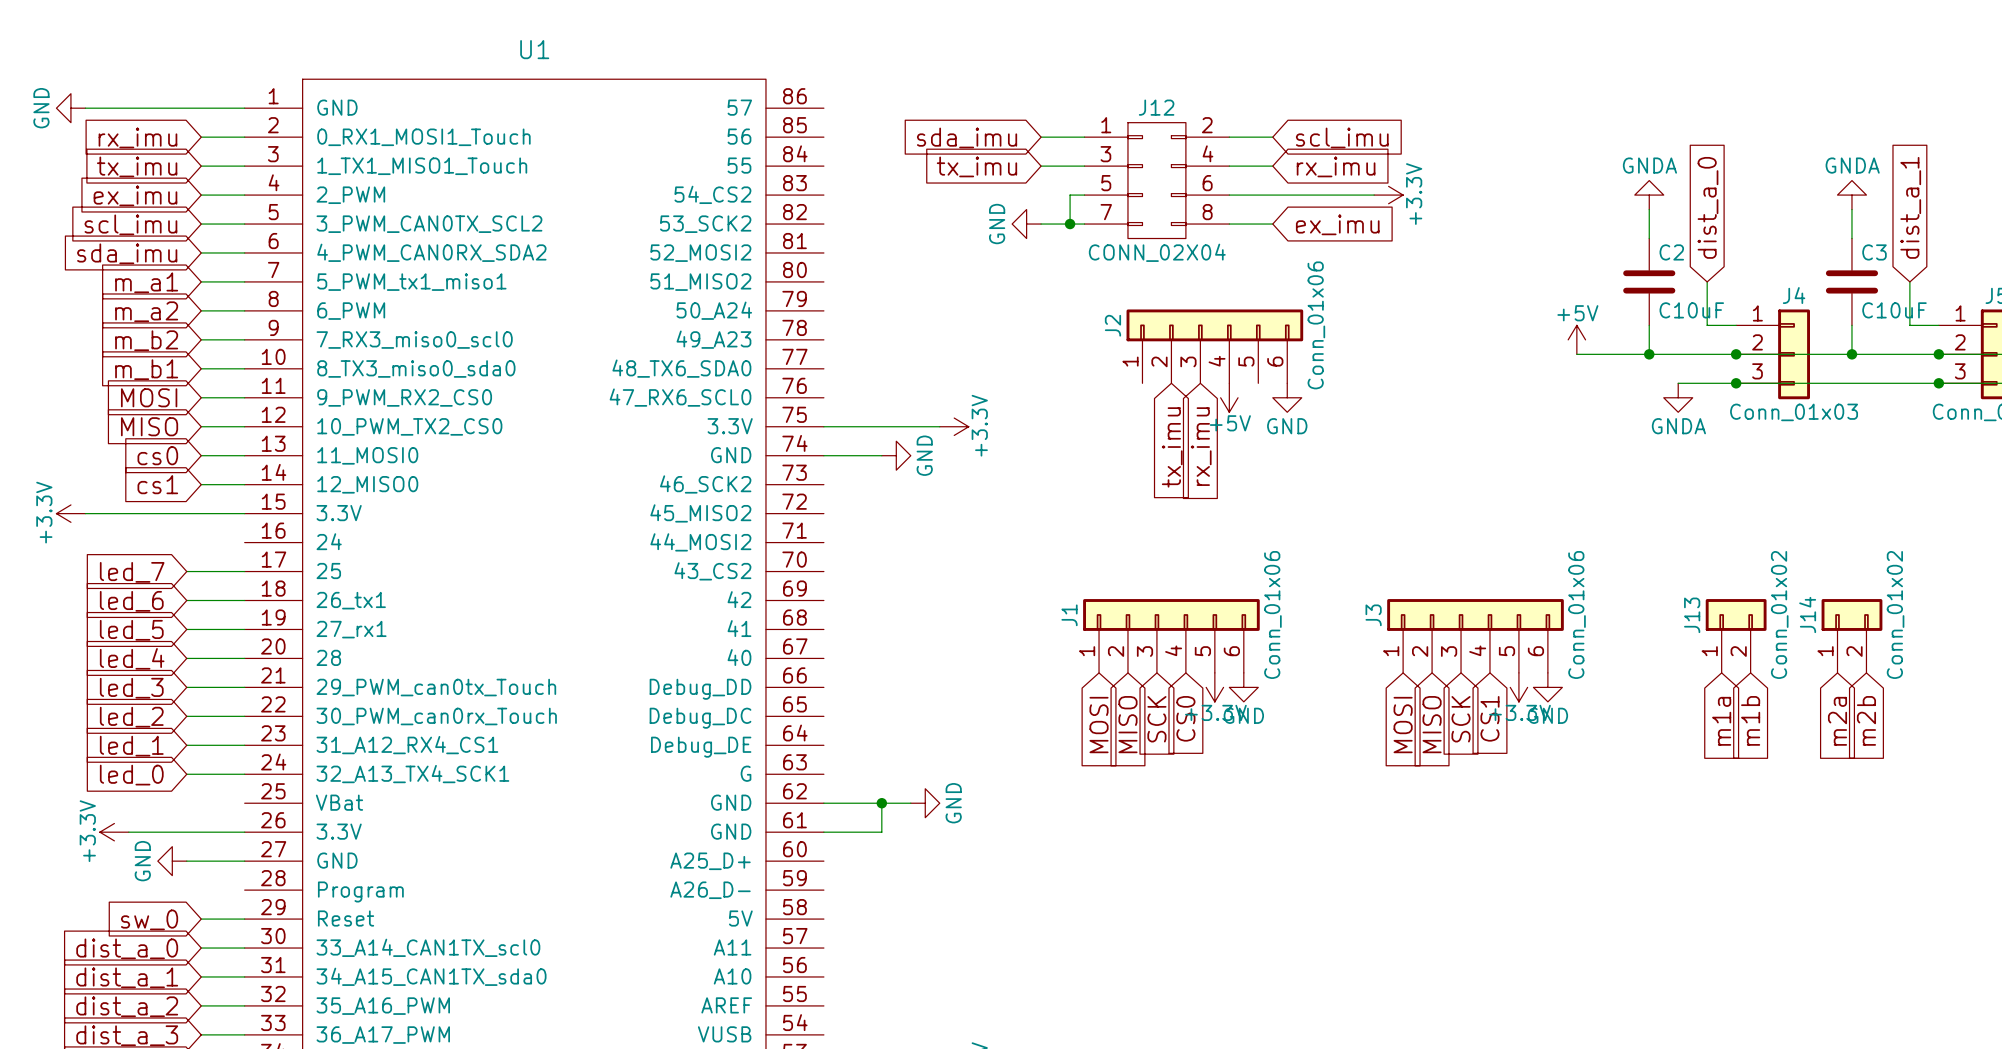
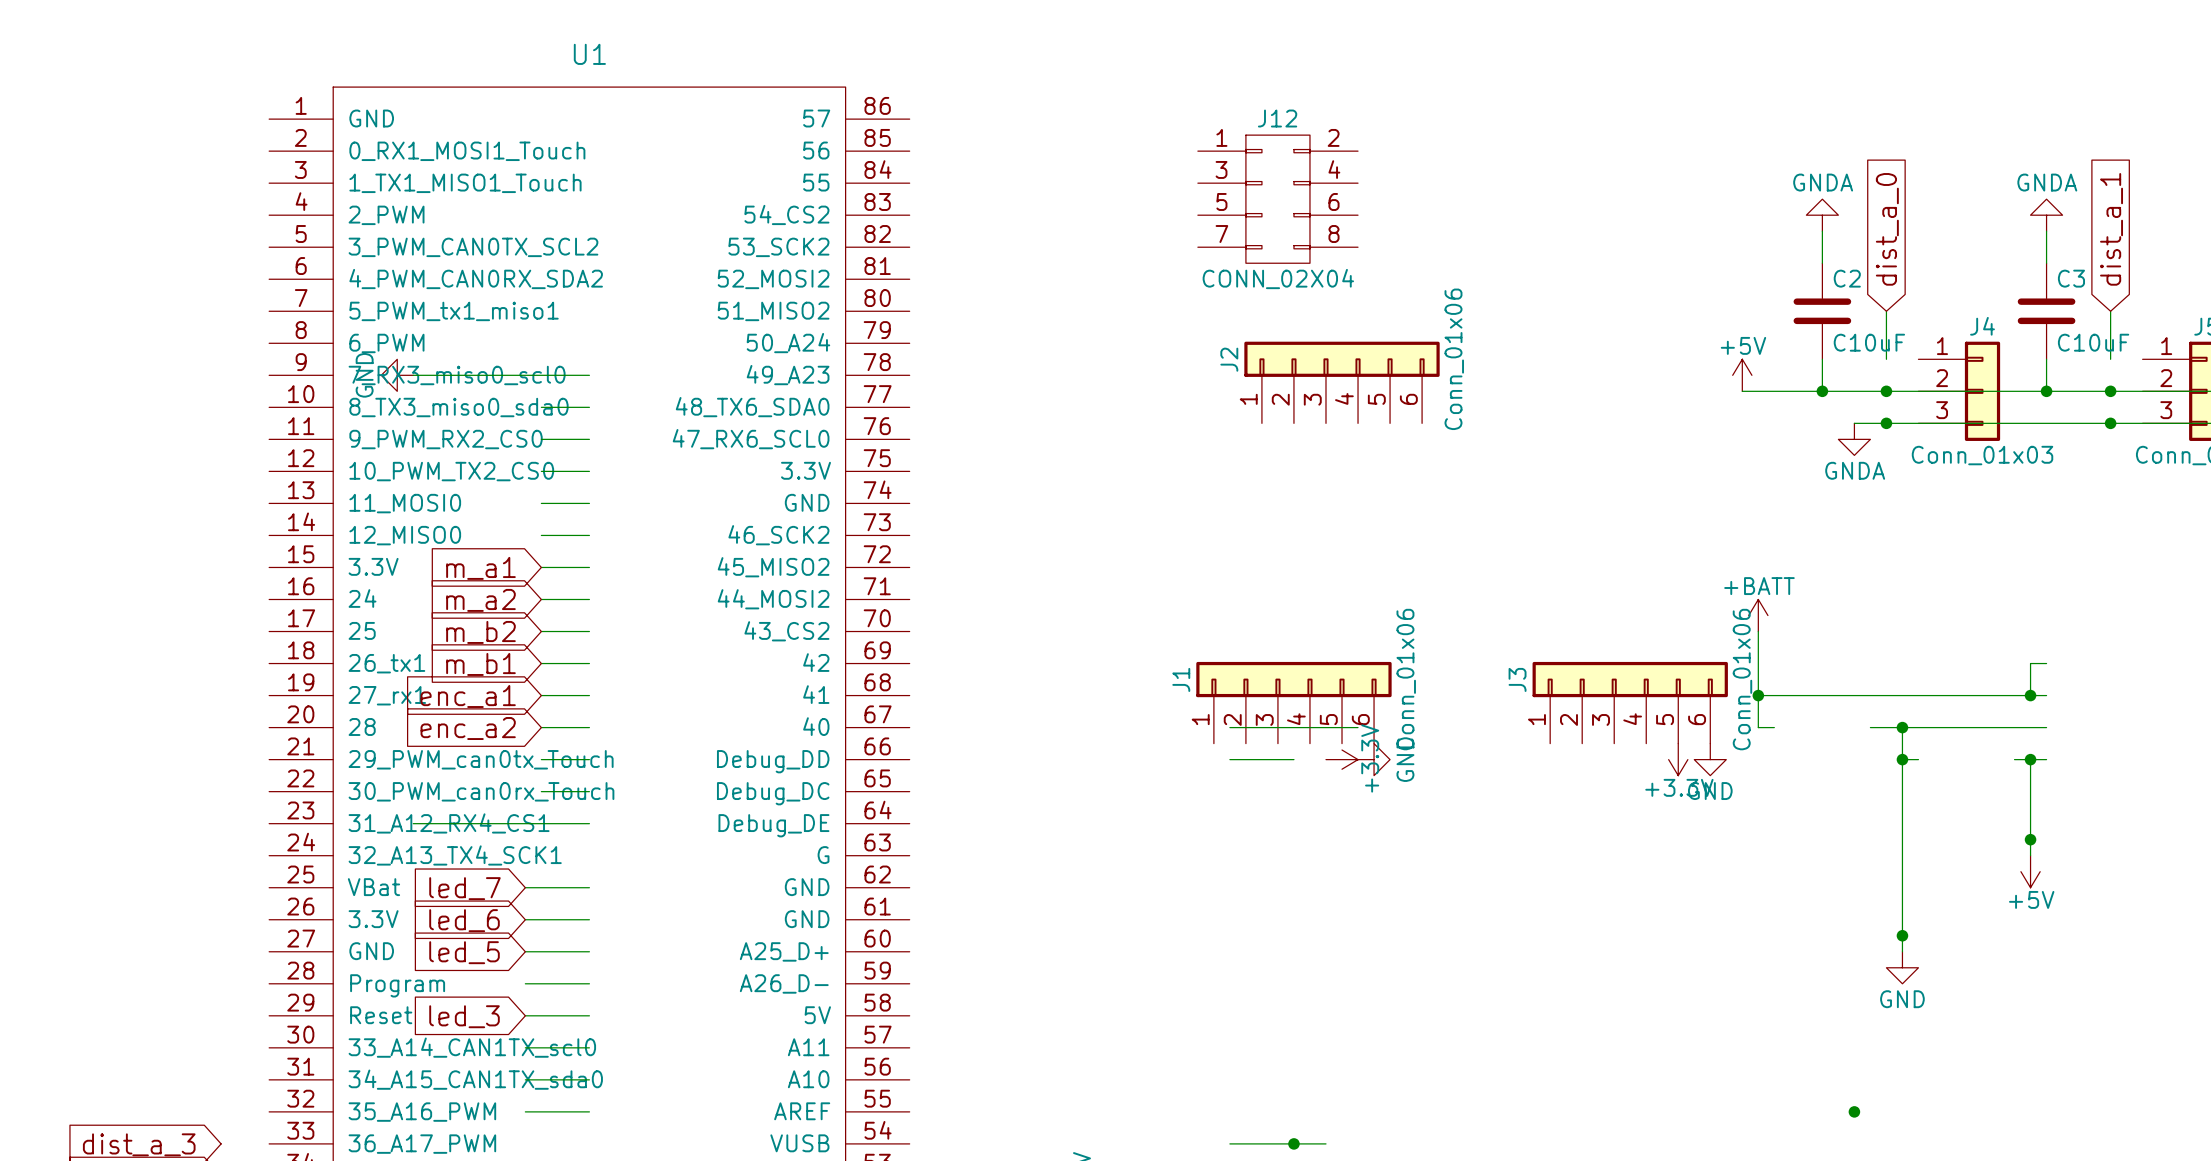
power symbol: GND (70, 108) -> none
wire: (85, 108) (244, 108) -> none
global label: rx_imu (137, 137) -> none
wire: (201, 137) (244, 137) -> none
global label: sda_imu (967, 137) -> none
wire: (1041, 137) (1084, 137) -> none
wire: (1229, 137) (1272, 137) -> none
global label: scl_imu (1342, 137) -> none
global label: tx_imu (137, 166) -> none
wire: (201, 166) (244, 166) -> none
global label: tx_imu (976, 166) -> none
wire: (1041, 166) (1084, 166) -> none
wire: (1229, 166) (1272, 166) -> none
global label: rx_imu (1336, 166) -> none
global label: ex_imu (135, 195) -> none
wire: (201, 195) (244, 195) -> none
wire: (1084, 195) (1070, 195) (1070, 224) -> none
wire: (1229, 195) (1374, 195) -> none
power symbol: +3.3V (1388, 195) -> none
global label: scl_imu (130, 224) -> none
wire: (201, 224) (244, 224) -> none
power symbol: GND (1026, 224) -> none
wire: (1041, 224) (1084, 224) -> none
junction: (1070, 224) -> none
wire: (1229, 224) (1272, 224) -> none
global label: ex_imu (1337, 224) -> none
wire: (201, 252) (244, 252) -> none
global label: sda_imu (127, 253) -> none
wire: (201, 281) (244, 281) -> none
global label: m_a1 (146, 282) -> none
wire: (201, 310) (244, 310) -> none
global label: m_a2 (146, 311) -> none
wire: (1707, 325) (1736, 325) -> none
wire: (1909, 325) (1938, 325) -> none
wire: (201, 339) (244, 339) -> none
power symbol: none -> GND (397, 375)
wire: none -> (413, 375) (589, 375)
global label: m_b2 (146, 340) -> none
junction: none -> (1886, 391)
junction: (1736, 354) -> none
junction: none -> (2110, 391)
junction: (1938, 354) -> none
wire: (201, 368) (244, 368) -> none
wire: none -> (541, 407) (589, 407)
global label: m_b1 (146, 369) -> none
junction: none -> (1886, 423)
junction: (1736, 383) -> none
junction: none -> (2110, 423)
junction: (1938, 383) -> none
global label: MOSI (149, 397) -> none
wire: (201, 397) (244, 397) -> none
wire: none -> (541, 439) (589, 439)
power symbol: +5V (1229, 397) -> none
power symbol: GND (1287, 397) -> none
global label: MISO (149, 426) -> none
wire: (201, 426) (244, 426) -> none
wire: none -> (541, 471) (589, 471)
wire: (823, 426) (939, 426) -> none
power symbol: +3.3V (954, 426) -> none
global label: rx_imu (1201, 446) -> none
global label: tx_imu (1172, 447) -> none
global label: cs0 (157, 455) -> none
wire: (201, 455) (244, 455) -> none
wire: none -> (541, 503) (589, 503)
wire: (823, 455) (881, 455) -> none
power symbol: GND (896, 455) -> none
global label: cs1 (157, 484) -> none
wire: (201, 484) (244, 484) -> none
wire: none -> (541, 535) (589, 535)
power symbol: +3.3V (70, 513) -> none
wire: (85, 513) (244, 513) -> none
wire: none -> (541, 567) (589, 567)
global label: none -> m_a1 (480, 568)
wire: none -> (541, 599) (589, 599)
global label: none -> m_a2 (480, 600)
power symbol: none -> +BATT (1758, 615)
wire: (186, 571) (244, 571) -> none
wire: none -> (541, 631) (589, 631)
wire: none -> (1758, 631) (1758, 727) (1774, 727)
global label: led_7 (132, 572) -> none
global label: none -> m_b2 (480, 632)
wire: (186, 600) (244, 600) -> none
wire: none -> (541, 663) (589, 663)
global label: led_6 (131, 601) -> none
global label: none -> m_b1 (480, 664)
wire: (186, 629) (244, 629) -> none
wire: none -> (541, 695) (589, 695)
wire: none -> (1758, 695) (2046, 695)
junction: none -> (1758, 695)
junction: none -> (2030, 695)
global label: led_5 (131, 630) -> none
global label: none -> enc_a1 (468, 696)
J13: Conn_01x02 (1736, 635) -> none
J14: Conn_01x02 (1851, 635) -> none
global label: led_4 (132, 658) -> none
wire: (186, 658) (244, 658) -> none
wire: none -> (541, 727) (589, 727)
wire: none -> (1229, 727) (1358, 727)
wire: none -> (1870, 727) (2046, 727)
wire: none -> (1902, 727) (1902, 951)
junction: none -> (1902, 727)
global label: none -> enc_a2 (468, 728)
wire: (186, 687) (244, 687) -> none
wire: none -> (541, 759) (589, 759)
wire: none -> (1229, 759) (1293, 759)
power symbol rotation: 0° (1214, 687) -> 90° counterclockwise (1342, 759)
power symbol rotation: 0° (1243, 687) -> 90° counterclockwise (1374, 759)
wire: none -> (1902, 759) (1918, 759)
junction: none -> (1902, 759)
wire: none -> (2014, 759) (2046, 759)
wire: none -> (2030, 759) (2030, 855)
junction: none -> (2030, 759)
global label: led_3 (131, 688) -> none
wire: (186, 716) (244, 716) -> none
wire: none -> (541, 791) (589, 791)
global label: led_2 (131, 717) -> none
global label: CS0 (1185, 718) -> none
global label: CS1 (1489, 718) -> none
global label: SCK (1156, 719) -> none
global label: SCK (1461, 719) -> none
global label: m1b (1750, 720) -> none
global label: m2b (1866, 720) -> none
global label: m1a (1721, 721) -> none
global label: m2a (1837, 721) -> none
global label: MISO (1127, 724) -> none
global label: MISO (1432, 724) -> none
global label: MOSI (1099, 725) -> none
global label: MOSI (1403, 725) -> none
wire: (186, 745) (244, 745) -> none
wire: none -> (413, 823) (589, 823)
global label: led_1 (131, 746) -> none
junction: none -> (2030, 839)
wire: (186, 774) (244, 774) -> none
global label: led_0 (131, 775) -> none
power symbol: none -> +5V (2030, 871)
wire: none -> (525, 887) (589, 887)
wire: (823, 803) (910, 803) -> none
wire: (881, 803) (881, 832) (823, 832) -> none
junction: (881, 803) -> none
power symbol: GND (925, 803) -> none
global label: none -> led_7 (464, 888)
power symbol: +3.3V (114, 832) -> none
wire: (128, 832) (244, 832) -> none
wire: none -> (525, 919) (589, 919)
global label: none -> led_6 (464, 920)
junction: none -> (1902, 935)
power symbol: GND (172, 861) -> none
wire: (186, 861) (244, 861) -> none
global label: none -> led_5 (464, 952)
wire: none -> (525, 951) (589, 951)
power symbol: none -> GND (1902, 967)
wire: none -> (525, 983) (589, 983)
global label: sw_0 (149, 919) -> none
wire: (201, 919) (244, 919) -> none
global label: none -> led_3 (464, 1016)
wire: none -> (525, 1015) (589, 1015)
global label: dist_a_0 (127, 948) -> none
wire: (201, 948) (244, 948) -> none
wire: none -> (525, 1047) (589, 1047)
wire: (201, 976) (244, 976) -> none
wire: none -> (525, 1079) (589, 1079)
global label: dist_a_1 (127, 977) -> none
wire: (201, 1005) (244, 1005) -> none
wire: none -> (525, 1111) (589, 1111)
junction: none -> (1854, 1111)
global label: dist_a_2 (127, 1006) -> none
wire: (201, 1034) (244, 1034) -> none
wire: none -> (1229, 1143) (1325, 1143)
junction: none -> (1293, 1143)

